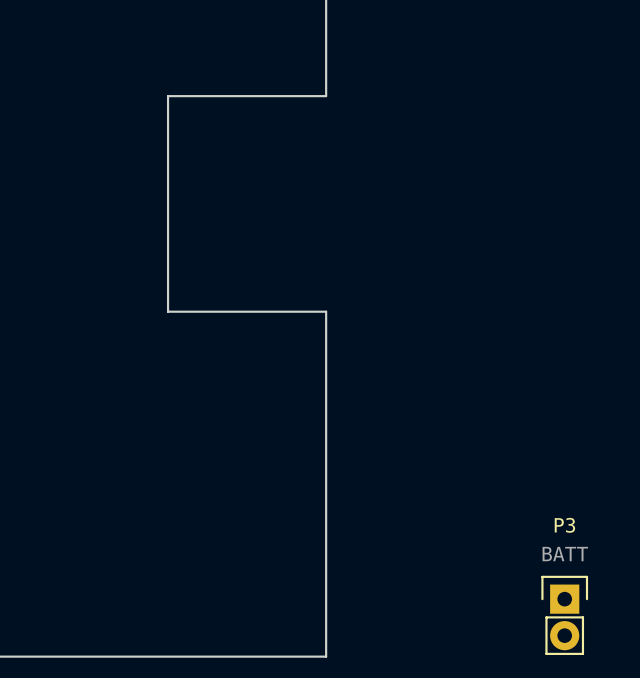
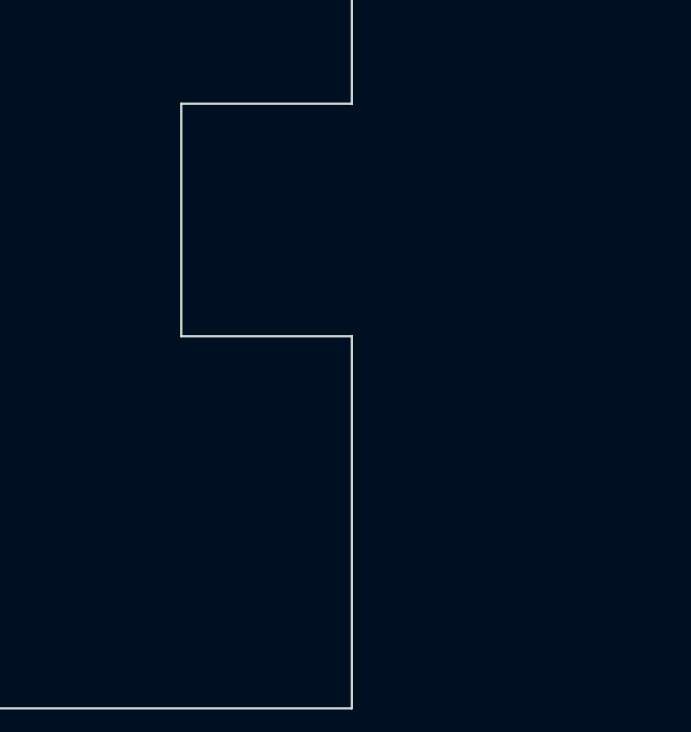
P3: BATT (564, 615) -> none

